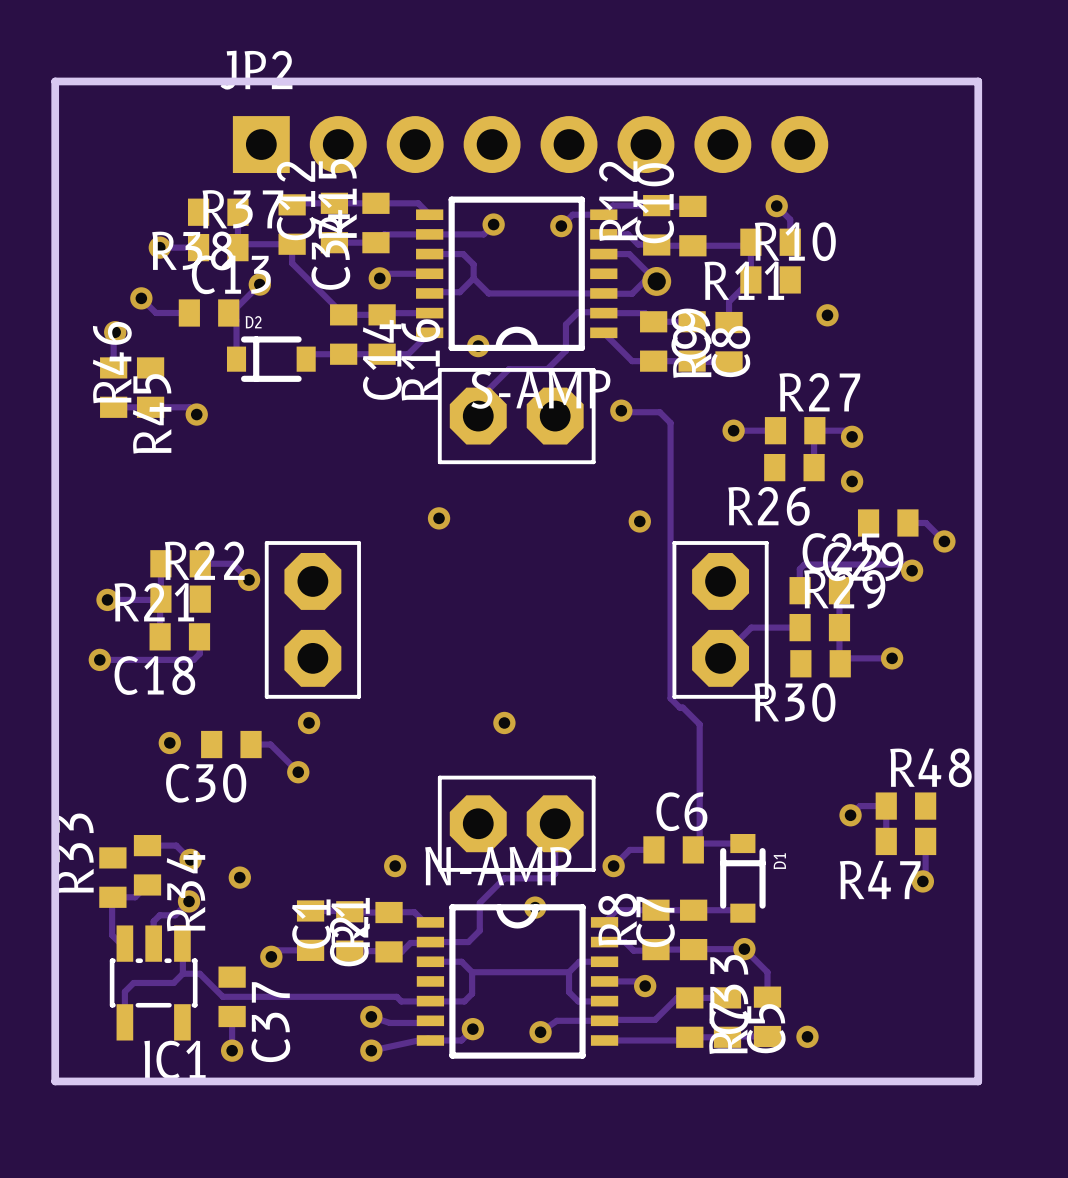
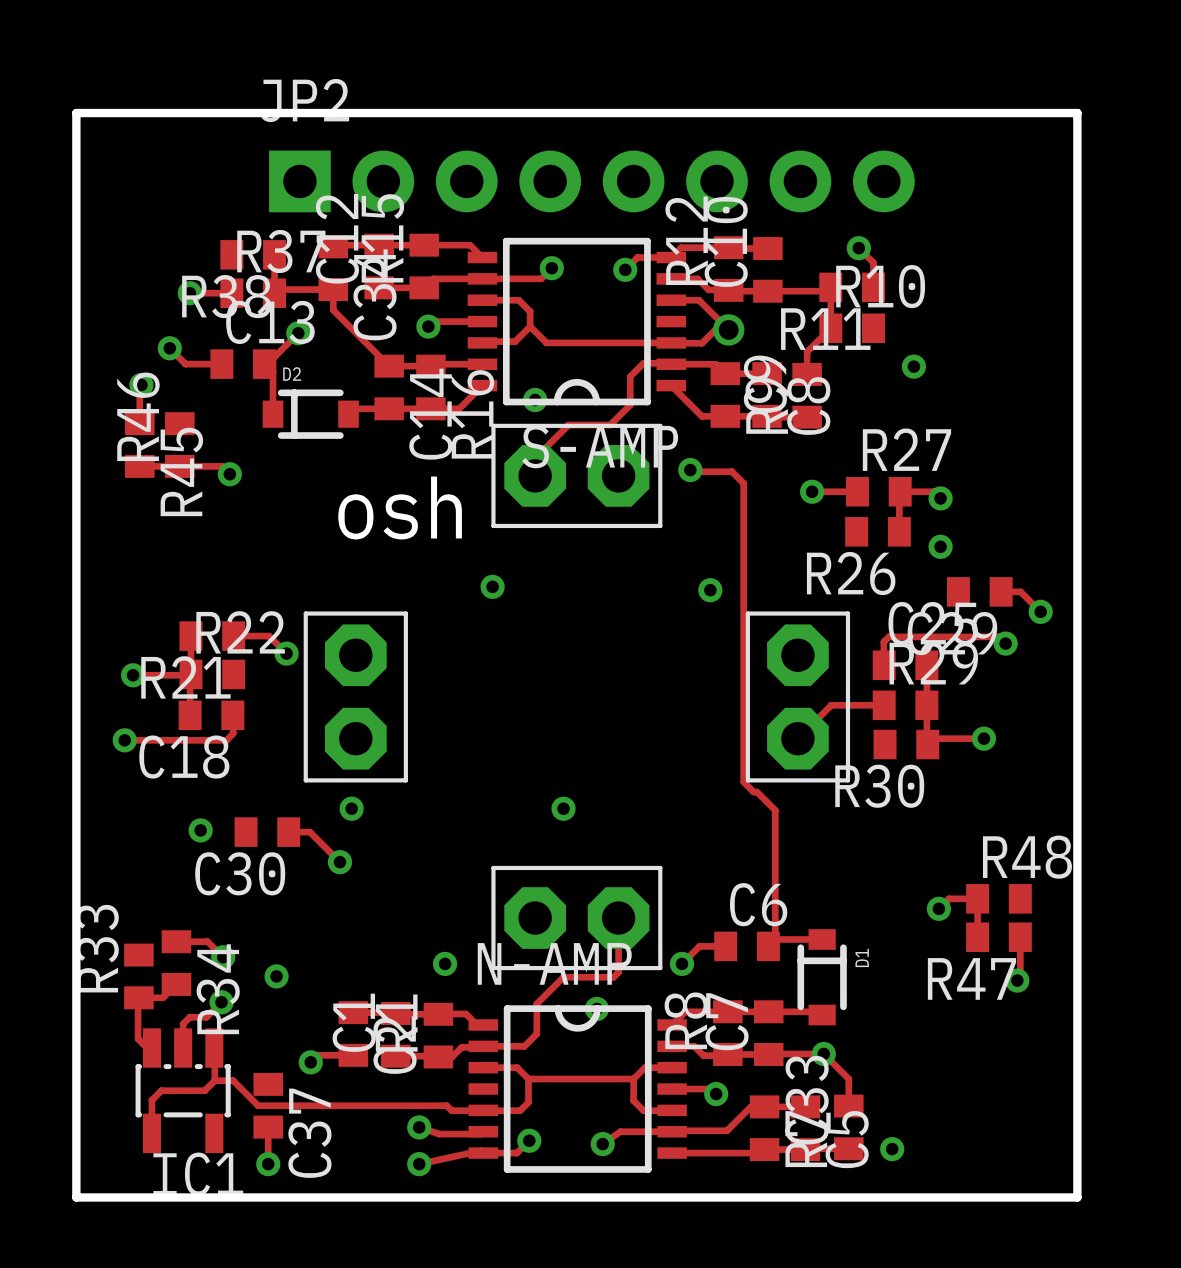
text: none -> osh (400, 508)

